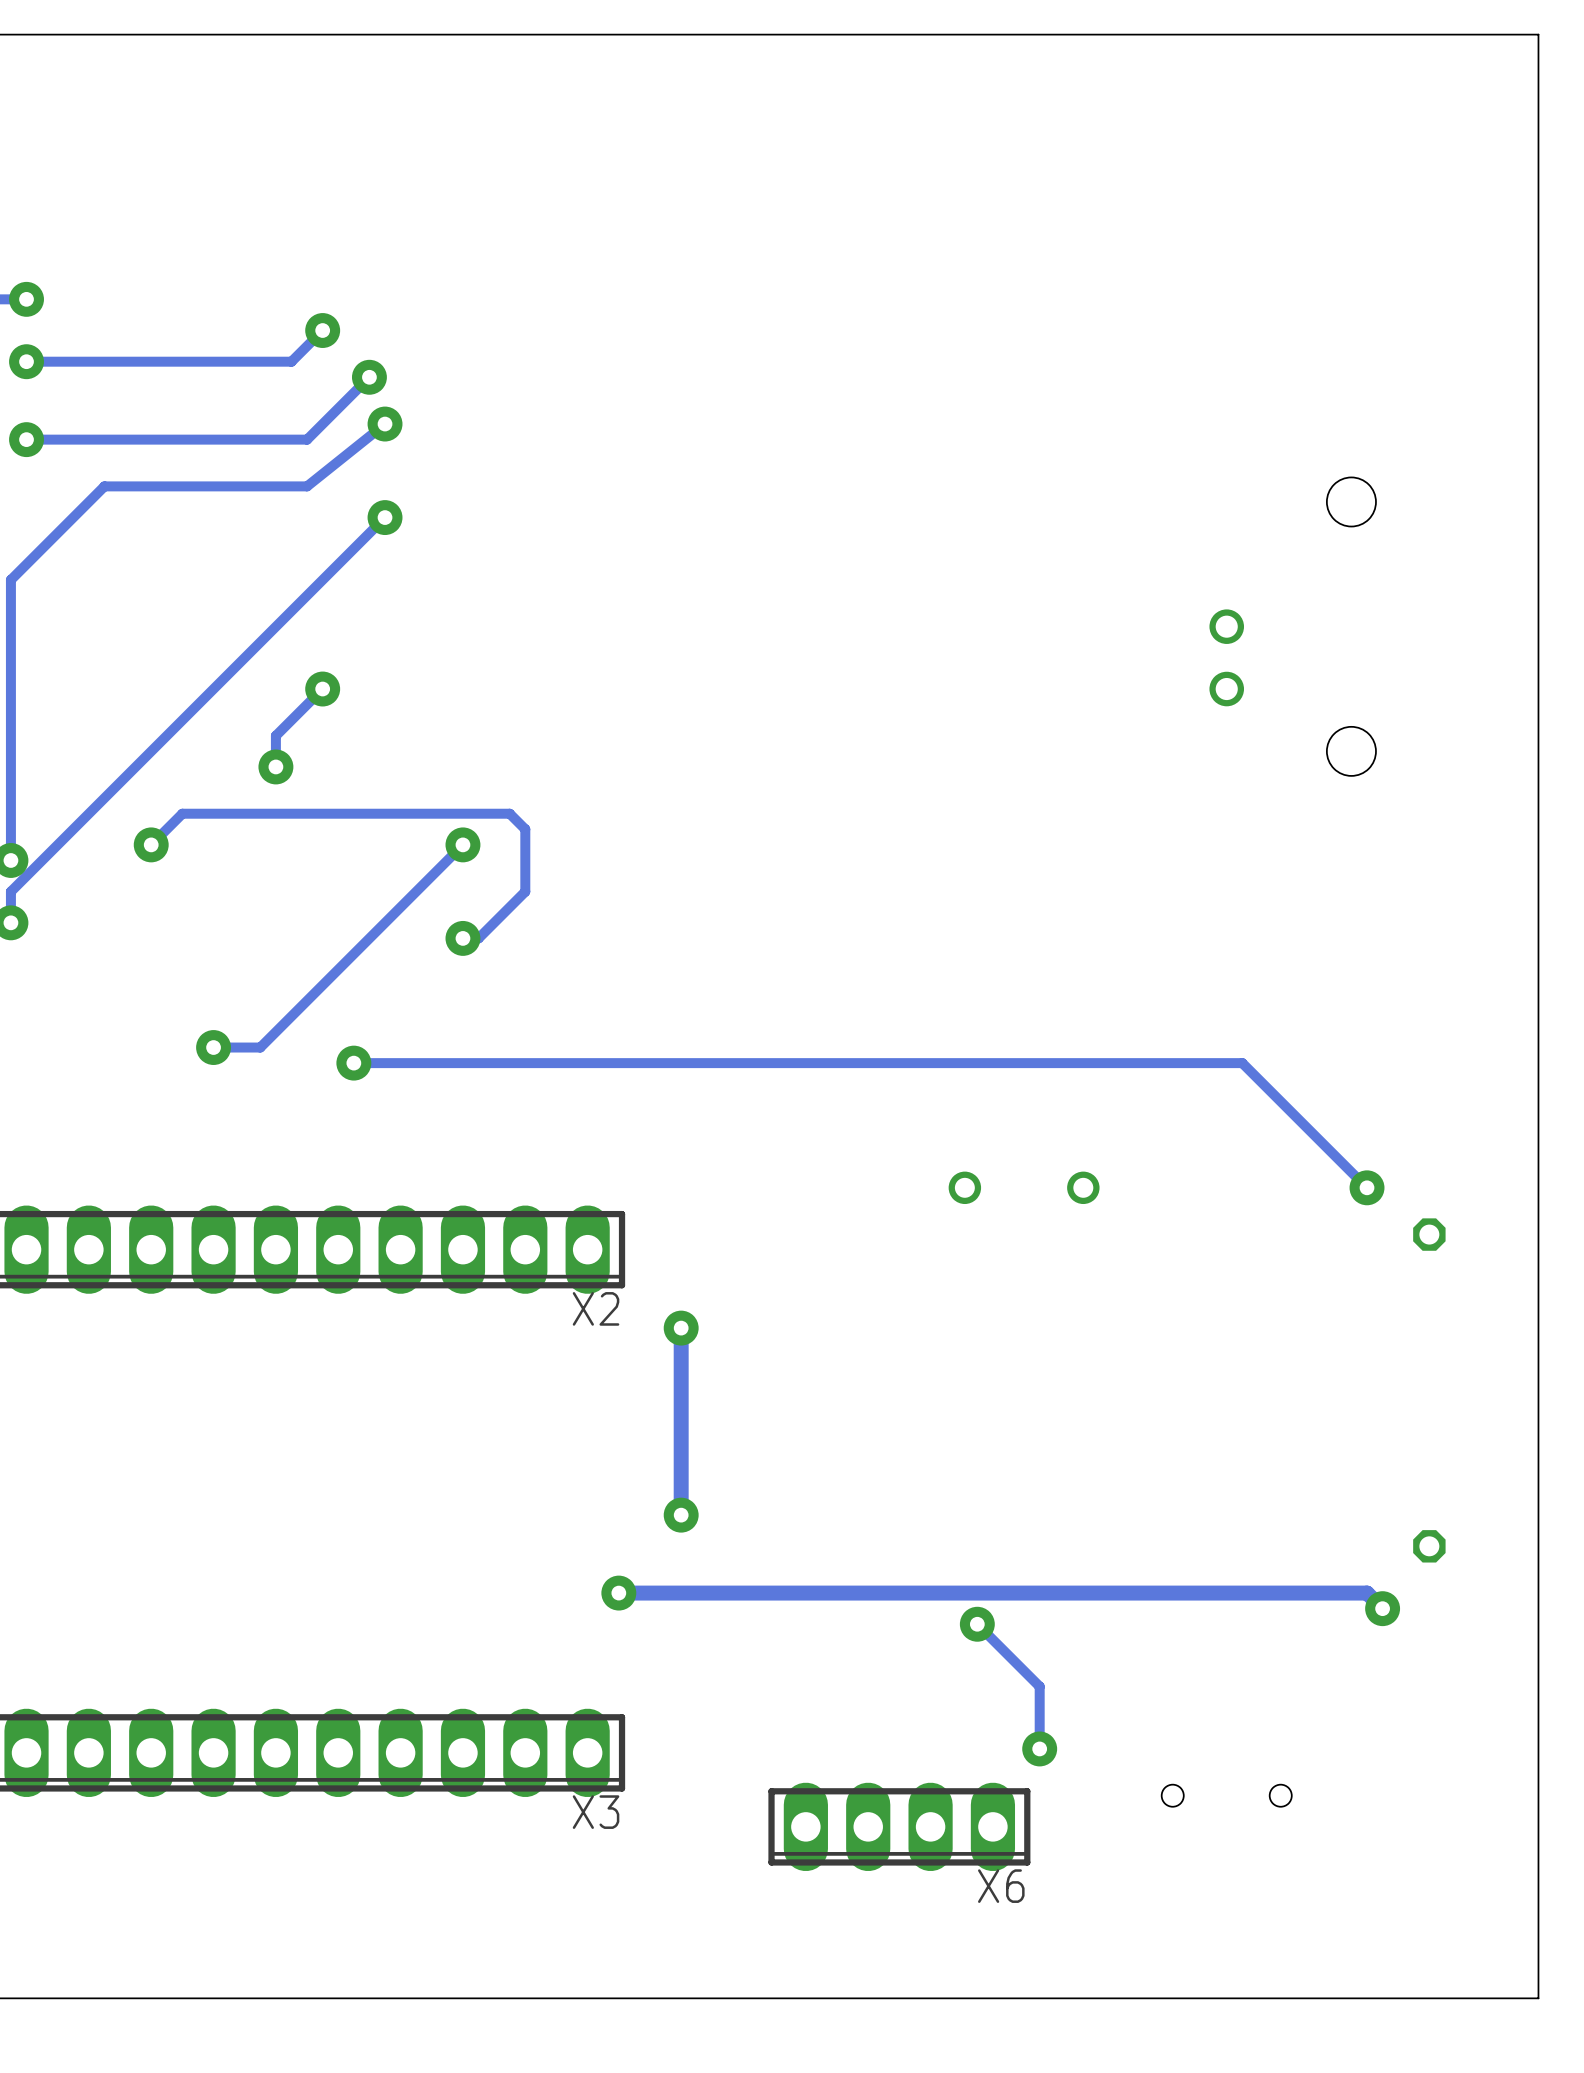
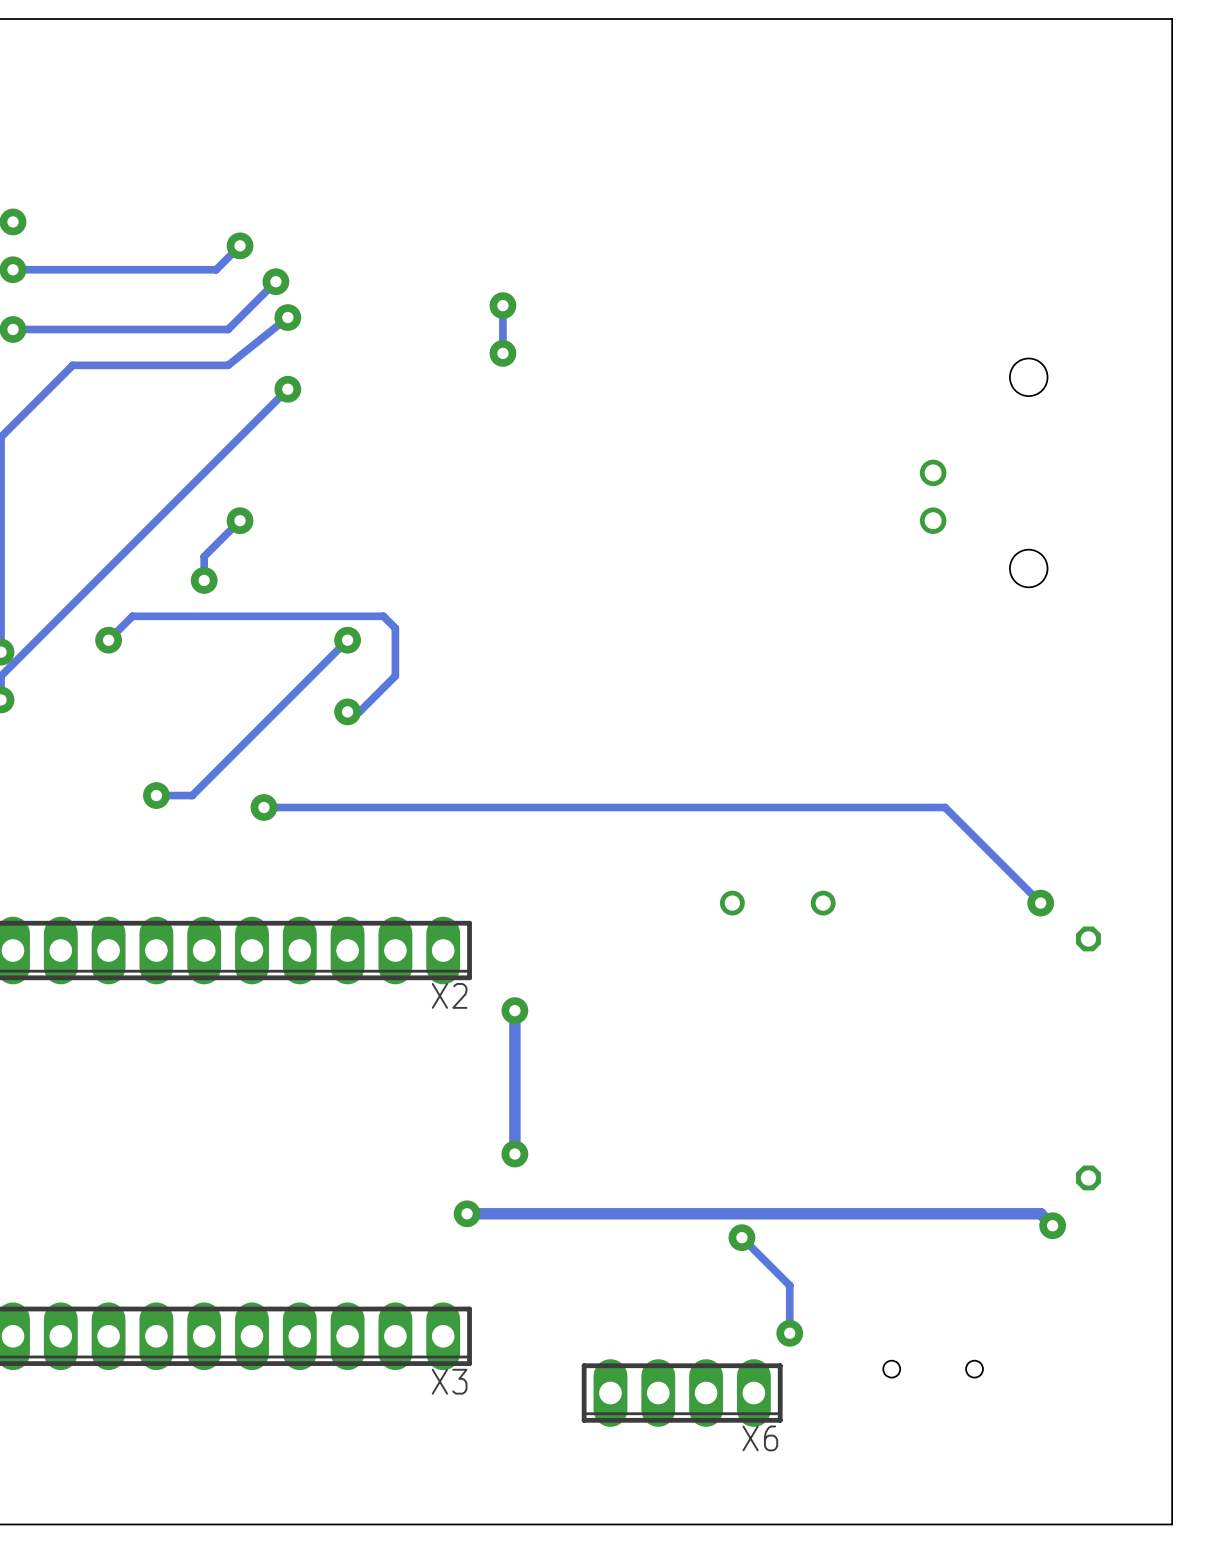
track: none -> (502, 305) (502, 353)
via: none -> (502, 305)
via: none -> (502, 353)

